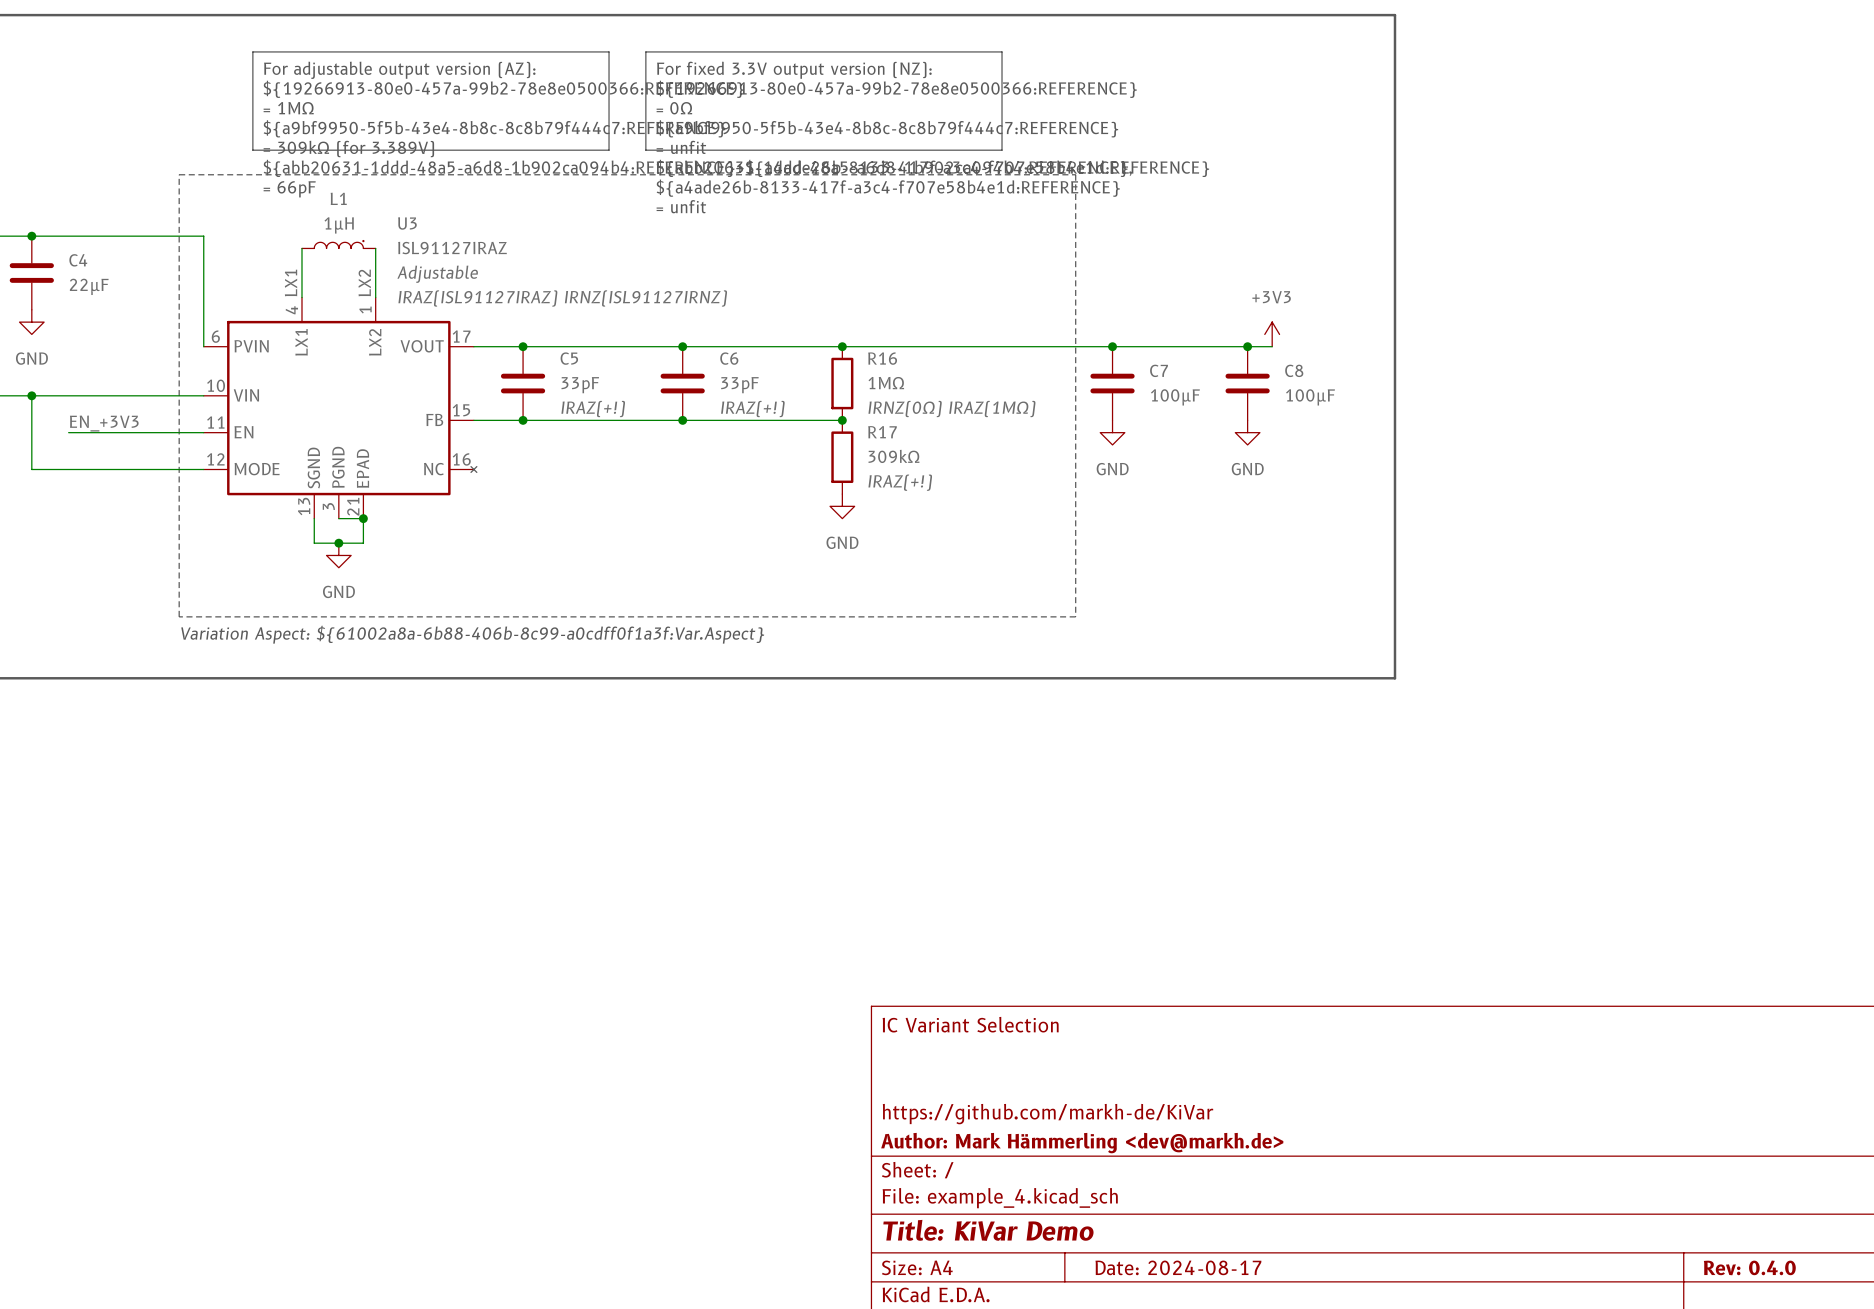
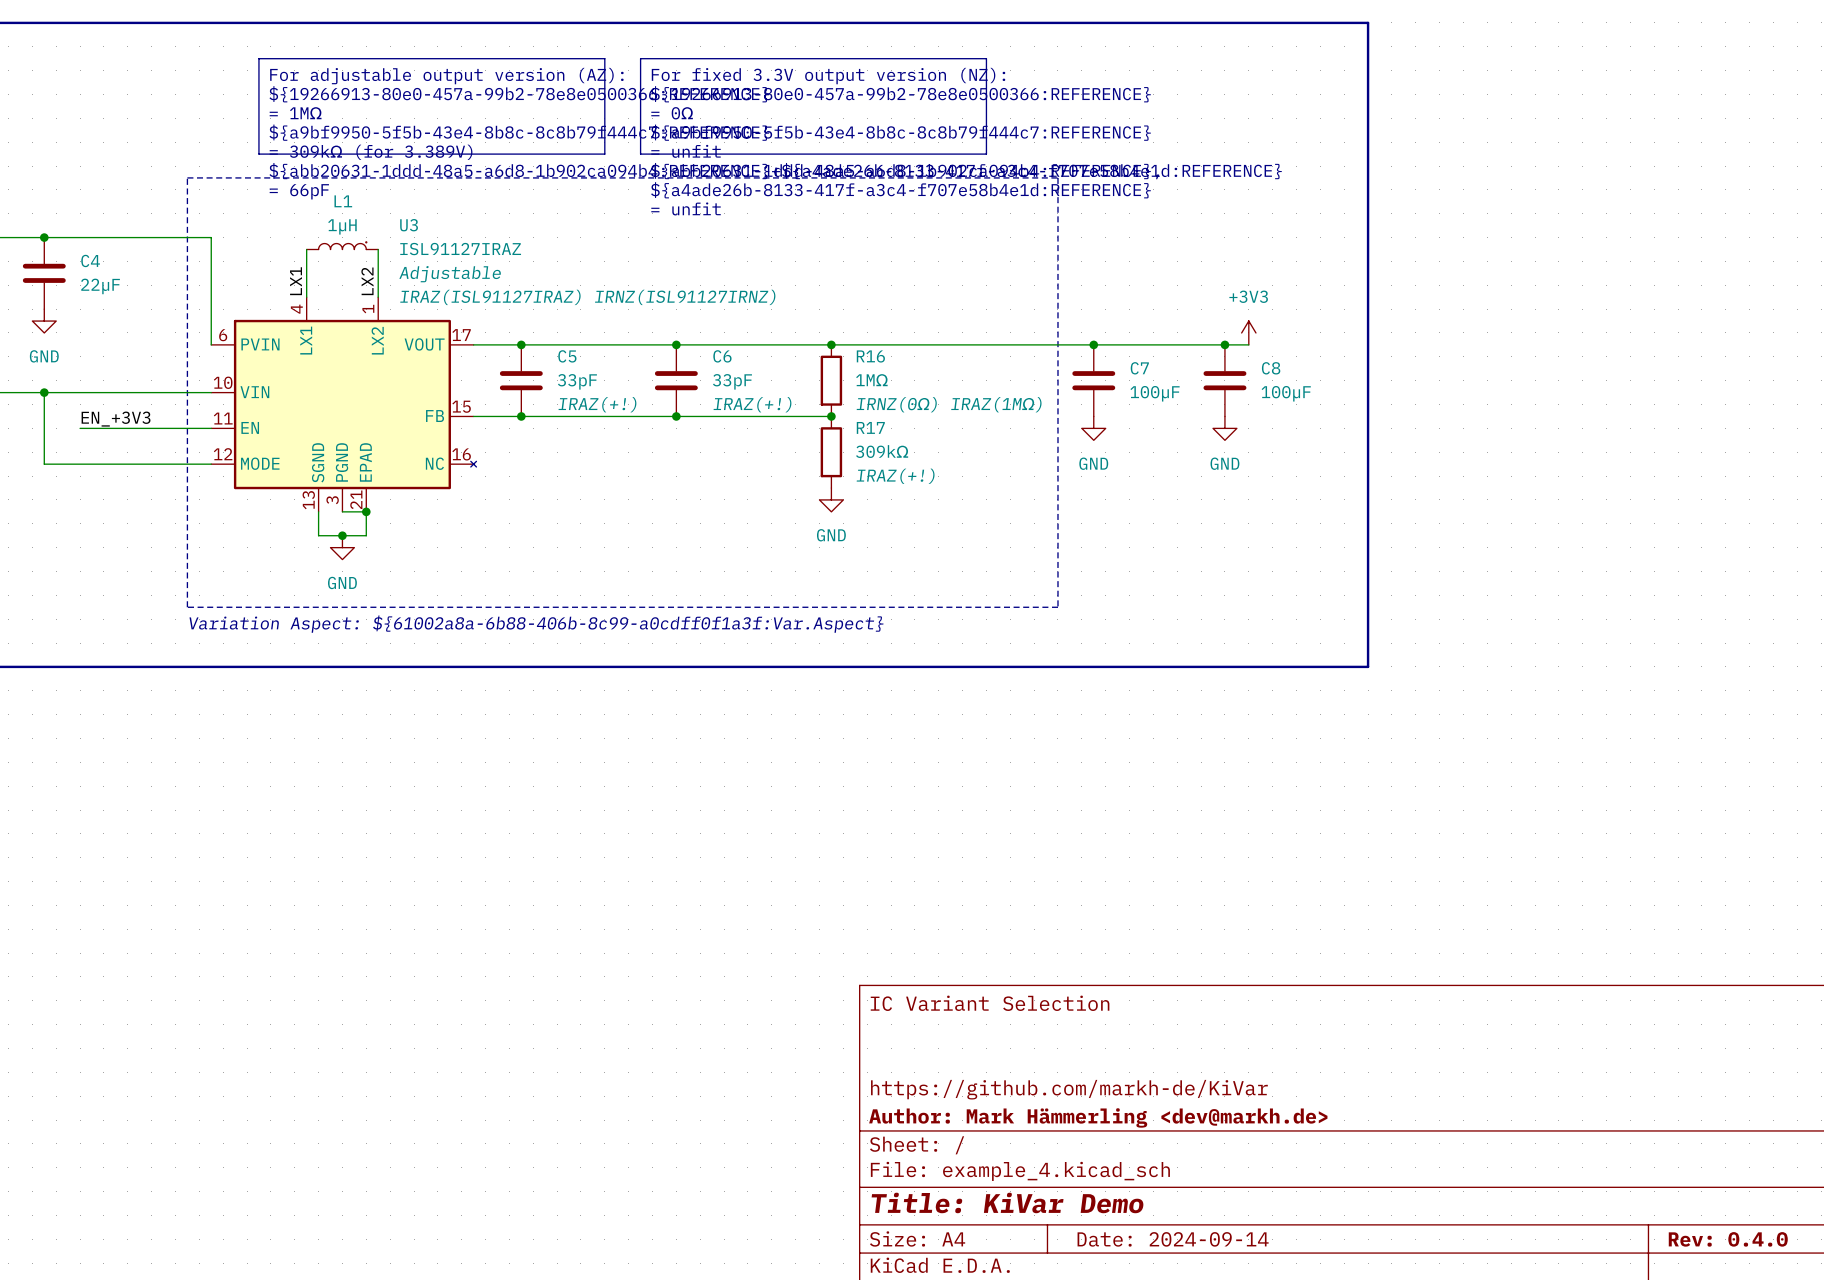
title block: Date: 2024-08-17 (1178, 1267) -> Date: 2024-09-14 (1173, 1239)

